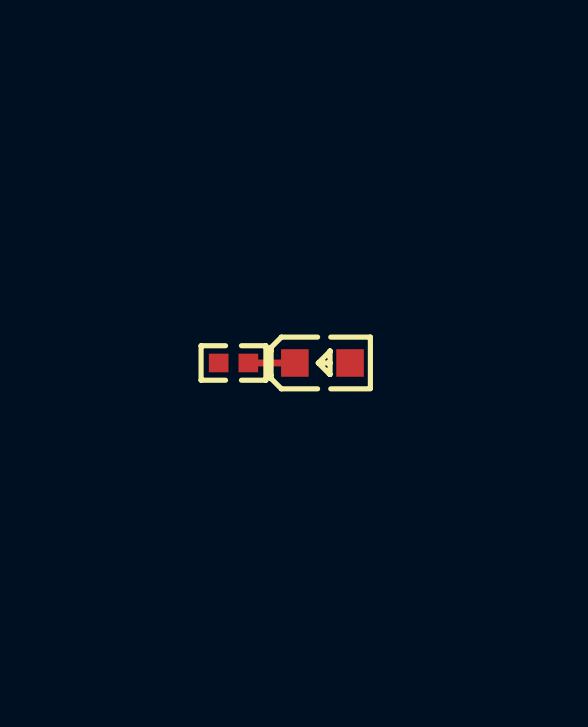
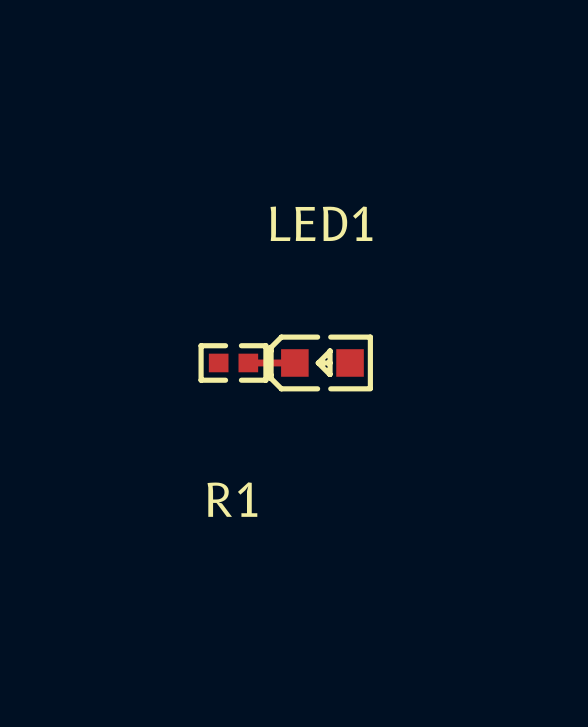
LED1 name: none -> LED1 (321, 223)
R1 name: none -> R1 (232, 499)

